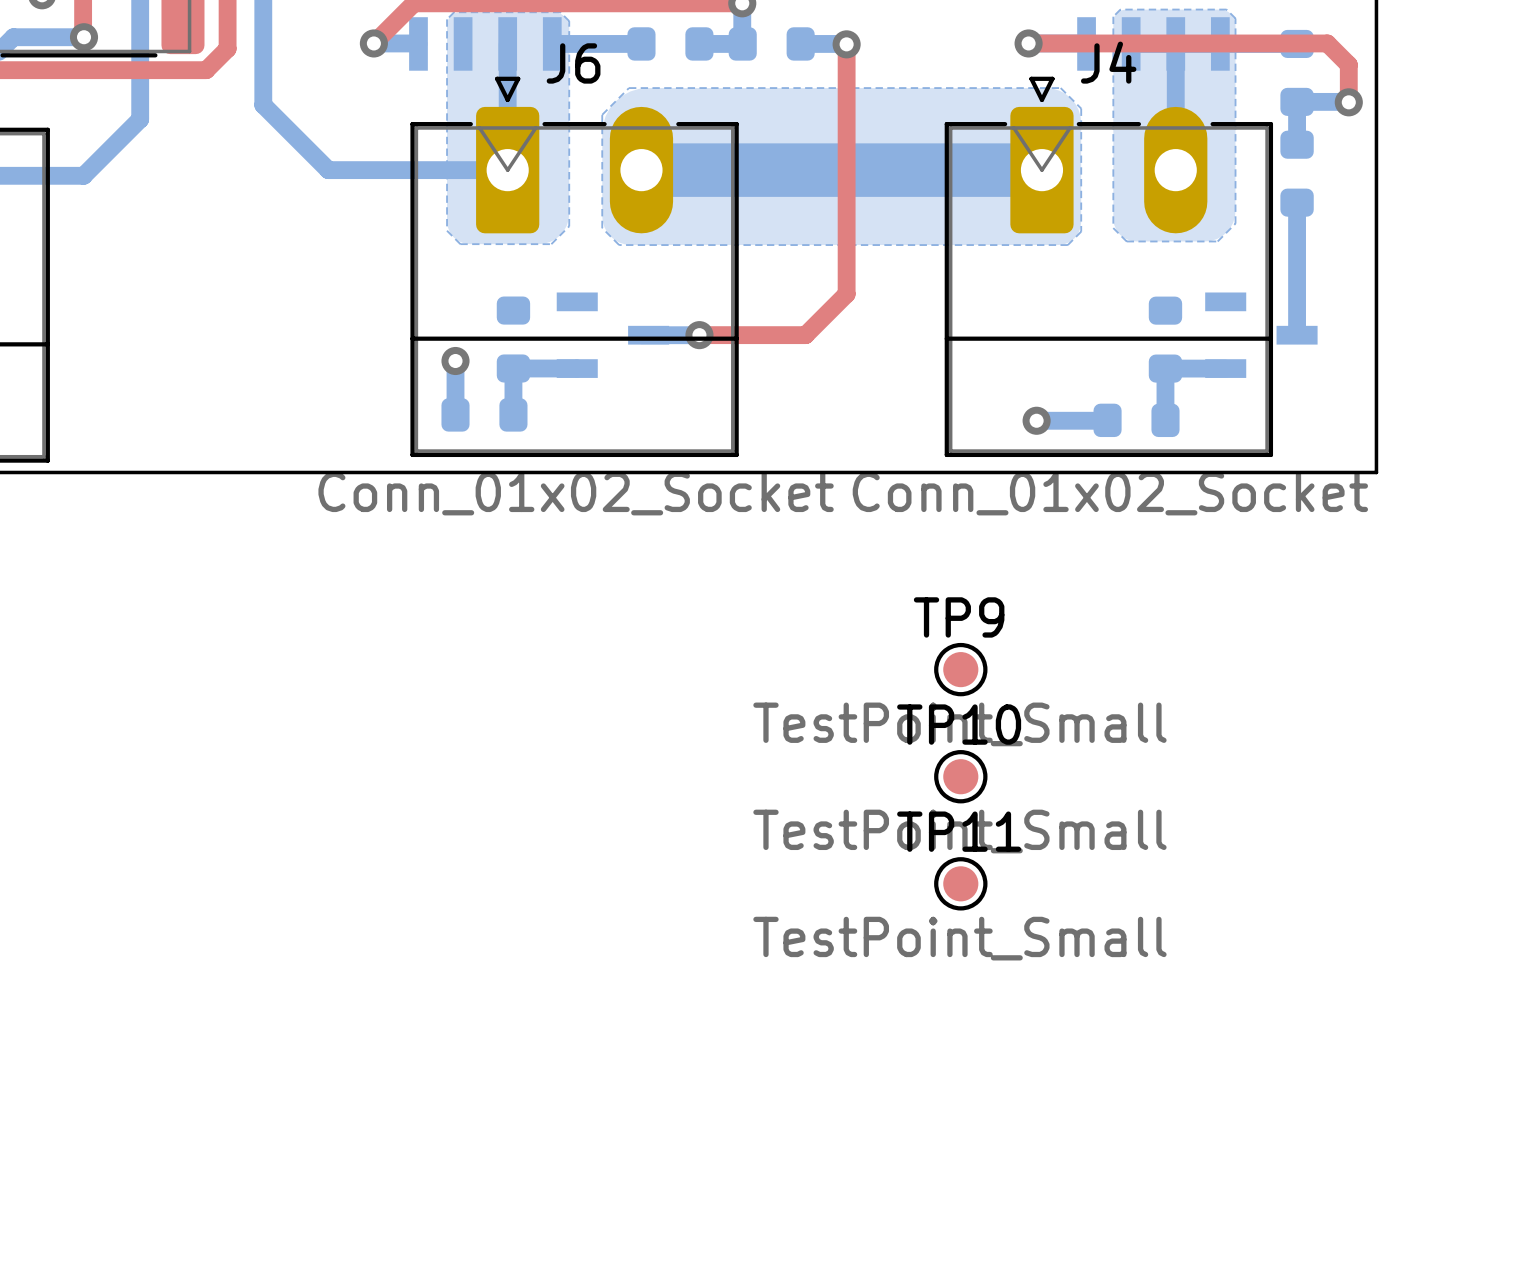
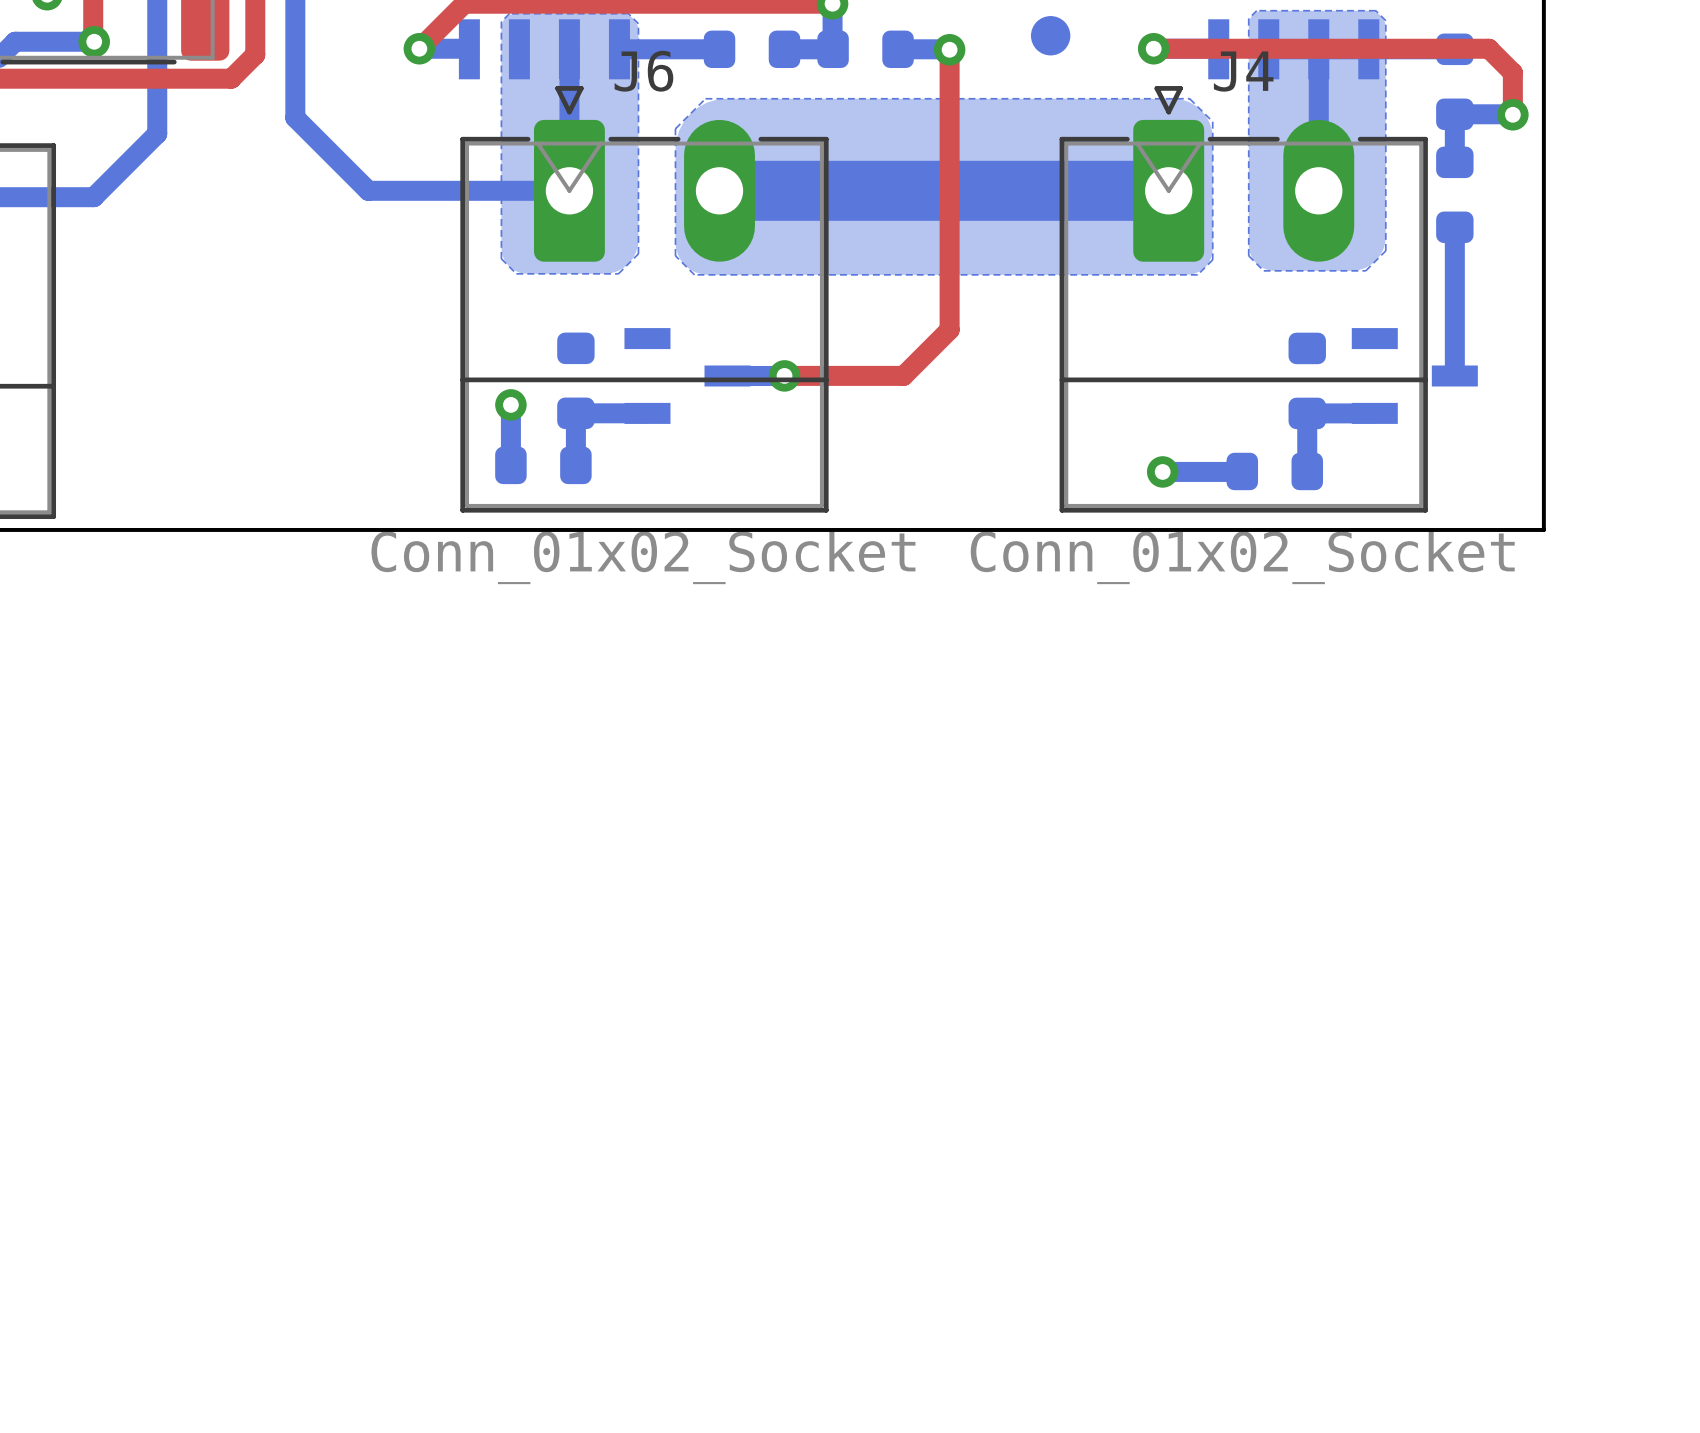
TP9: TestPoint_Small (960, 669) -> none
TP10 side: top (960, 776) -> bottom (1050, 35)
TP11: TestPoint_Small (960, 883) -> none

